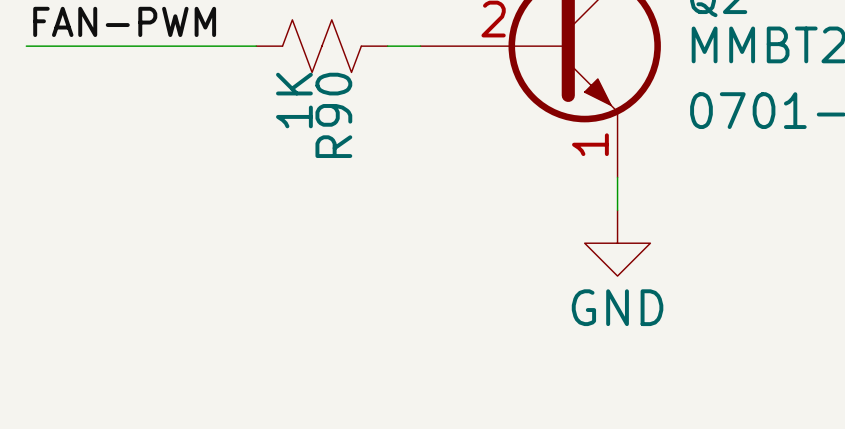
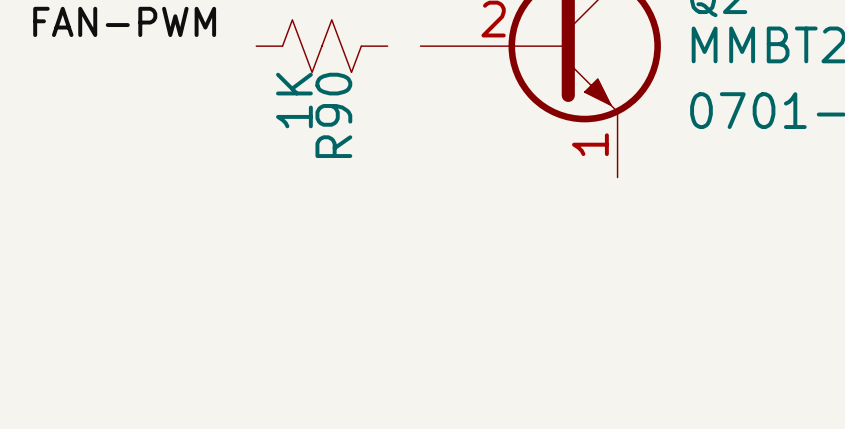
wire: (26, 46) (256, 46) -> none
wire: (387, 46) (420, 46) -> none
wire: (617, 177) (617, 210) -> none
power symbol: GND (617, 243) -> none

